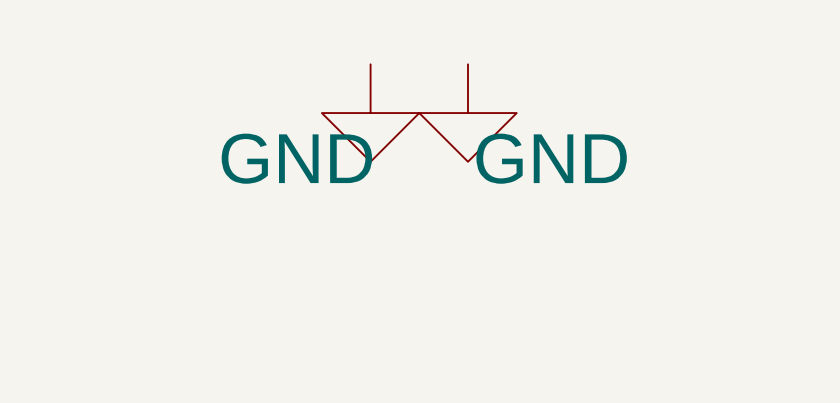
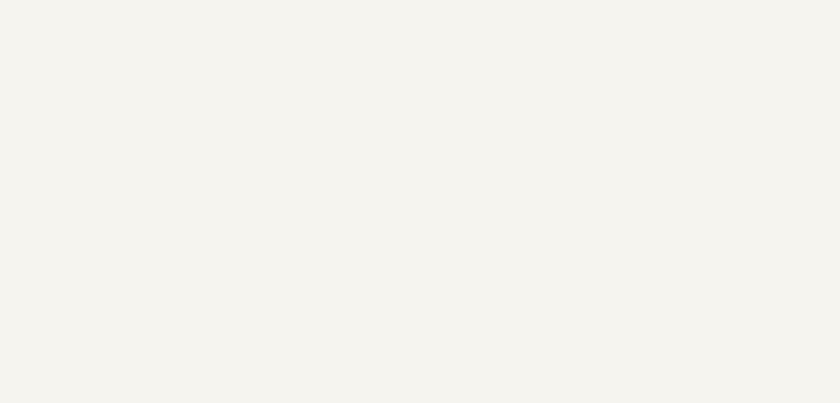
power symbol: GND (370, 113) -> none
power symbol: GND (468, 113) -> none

